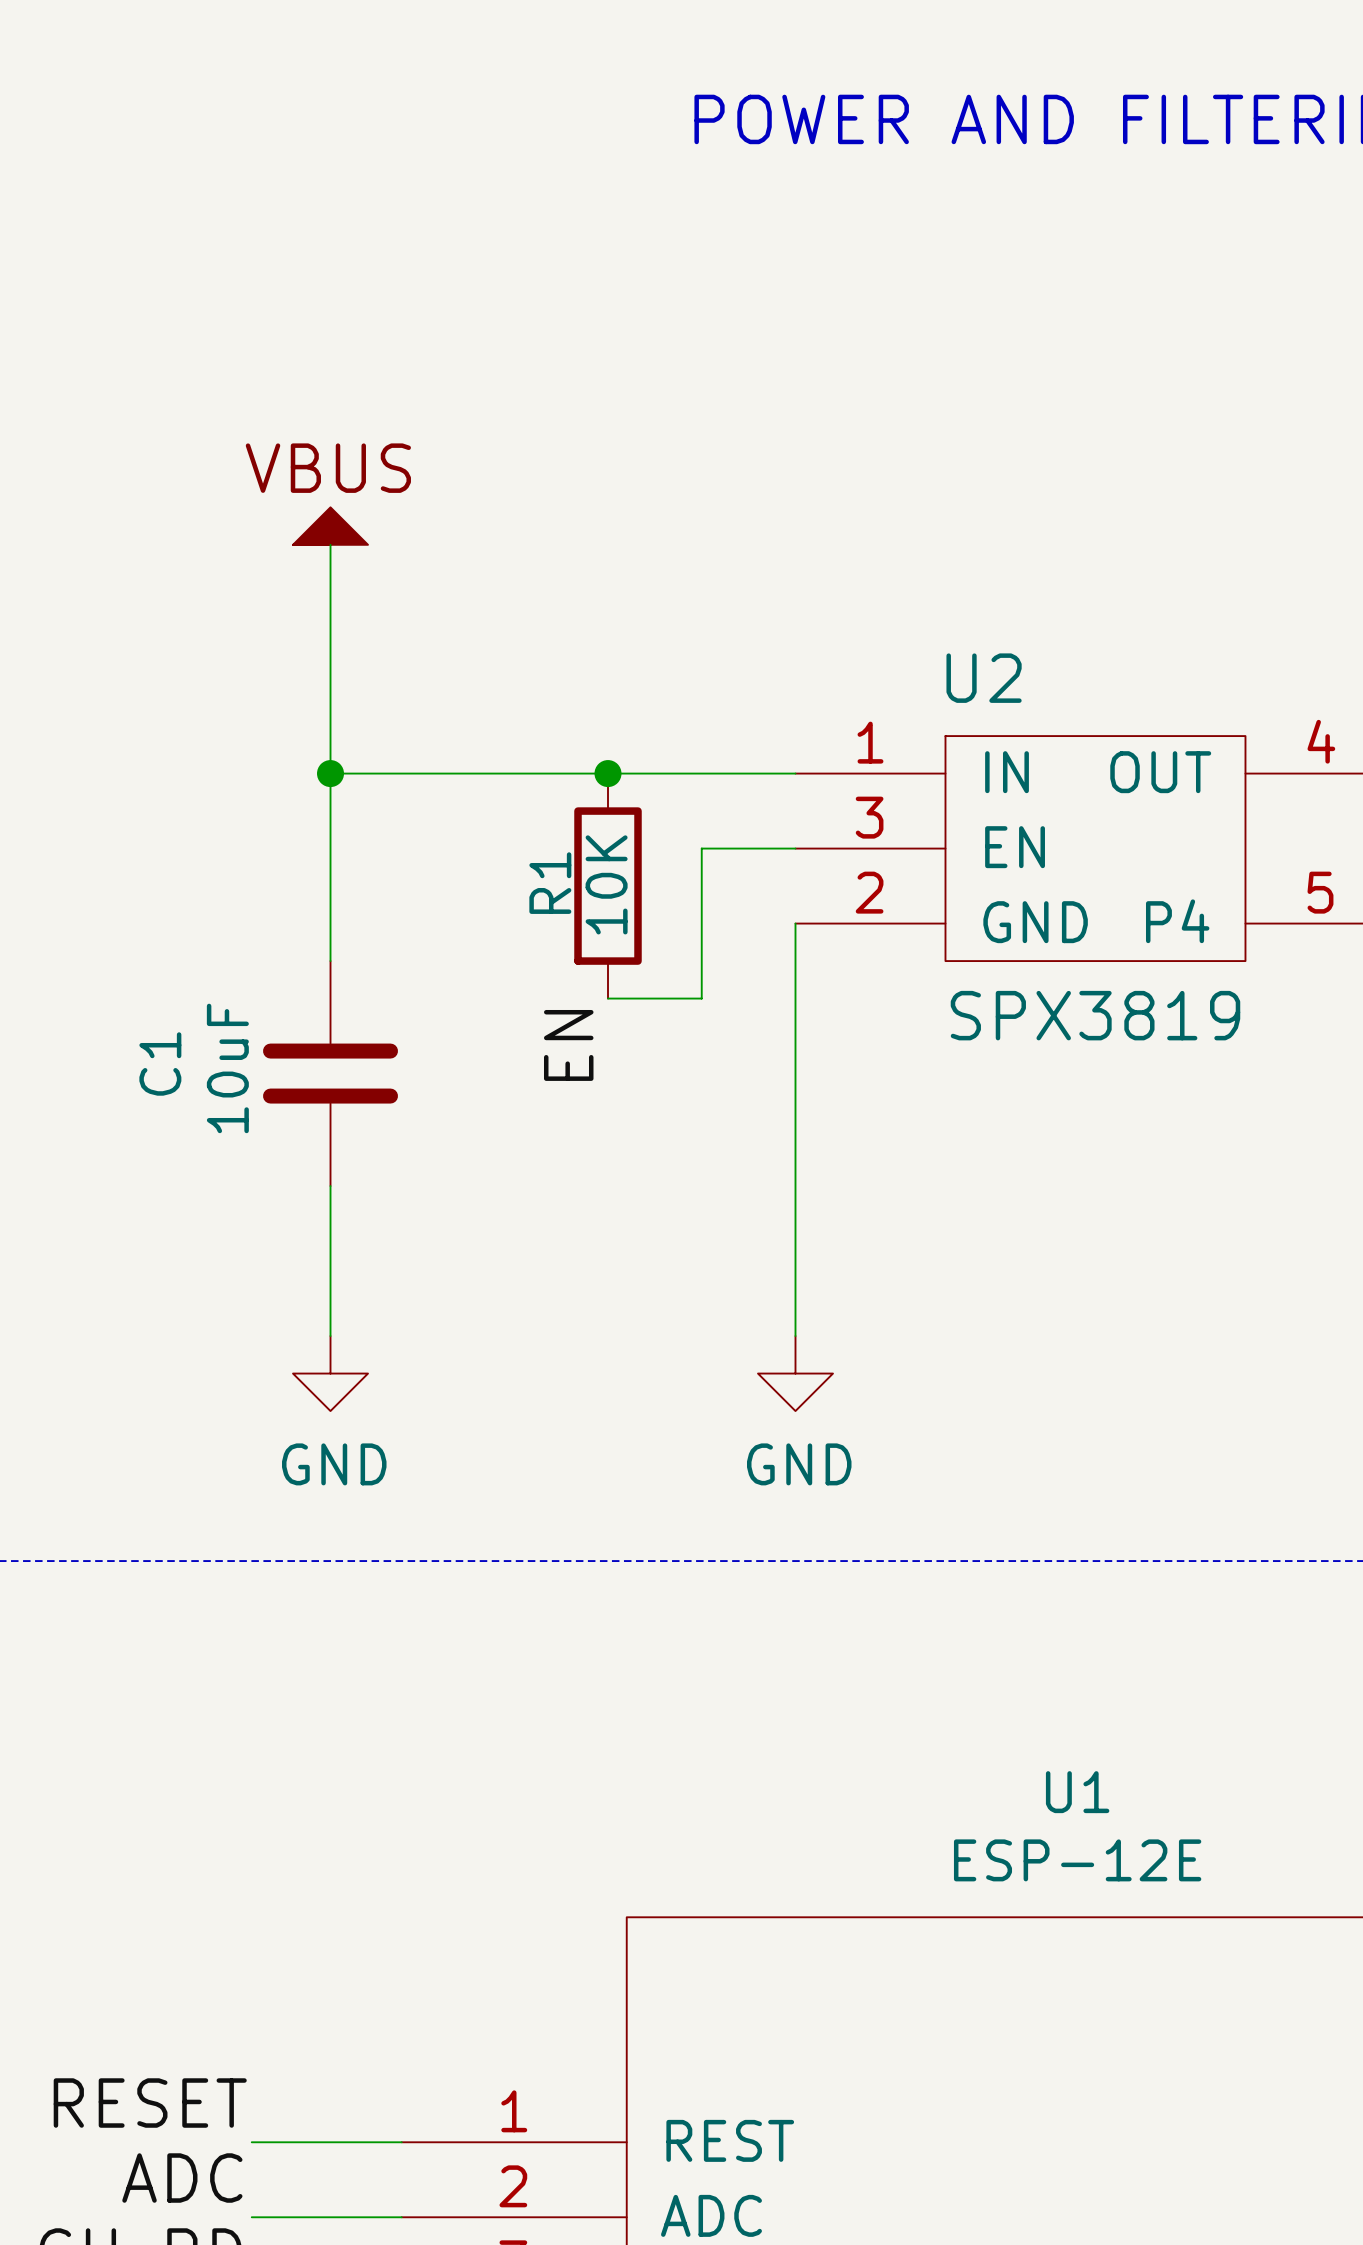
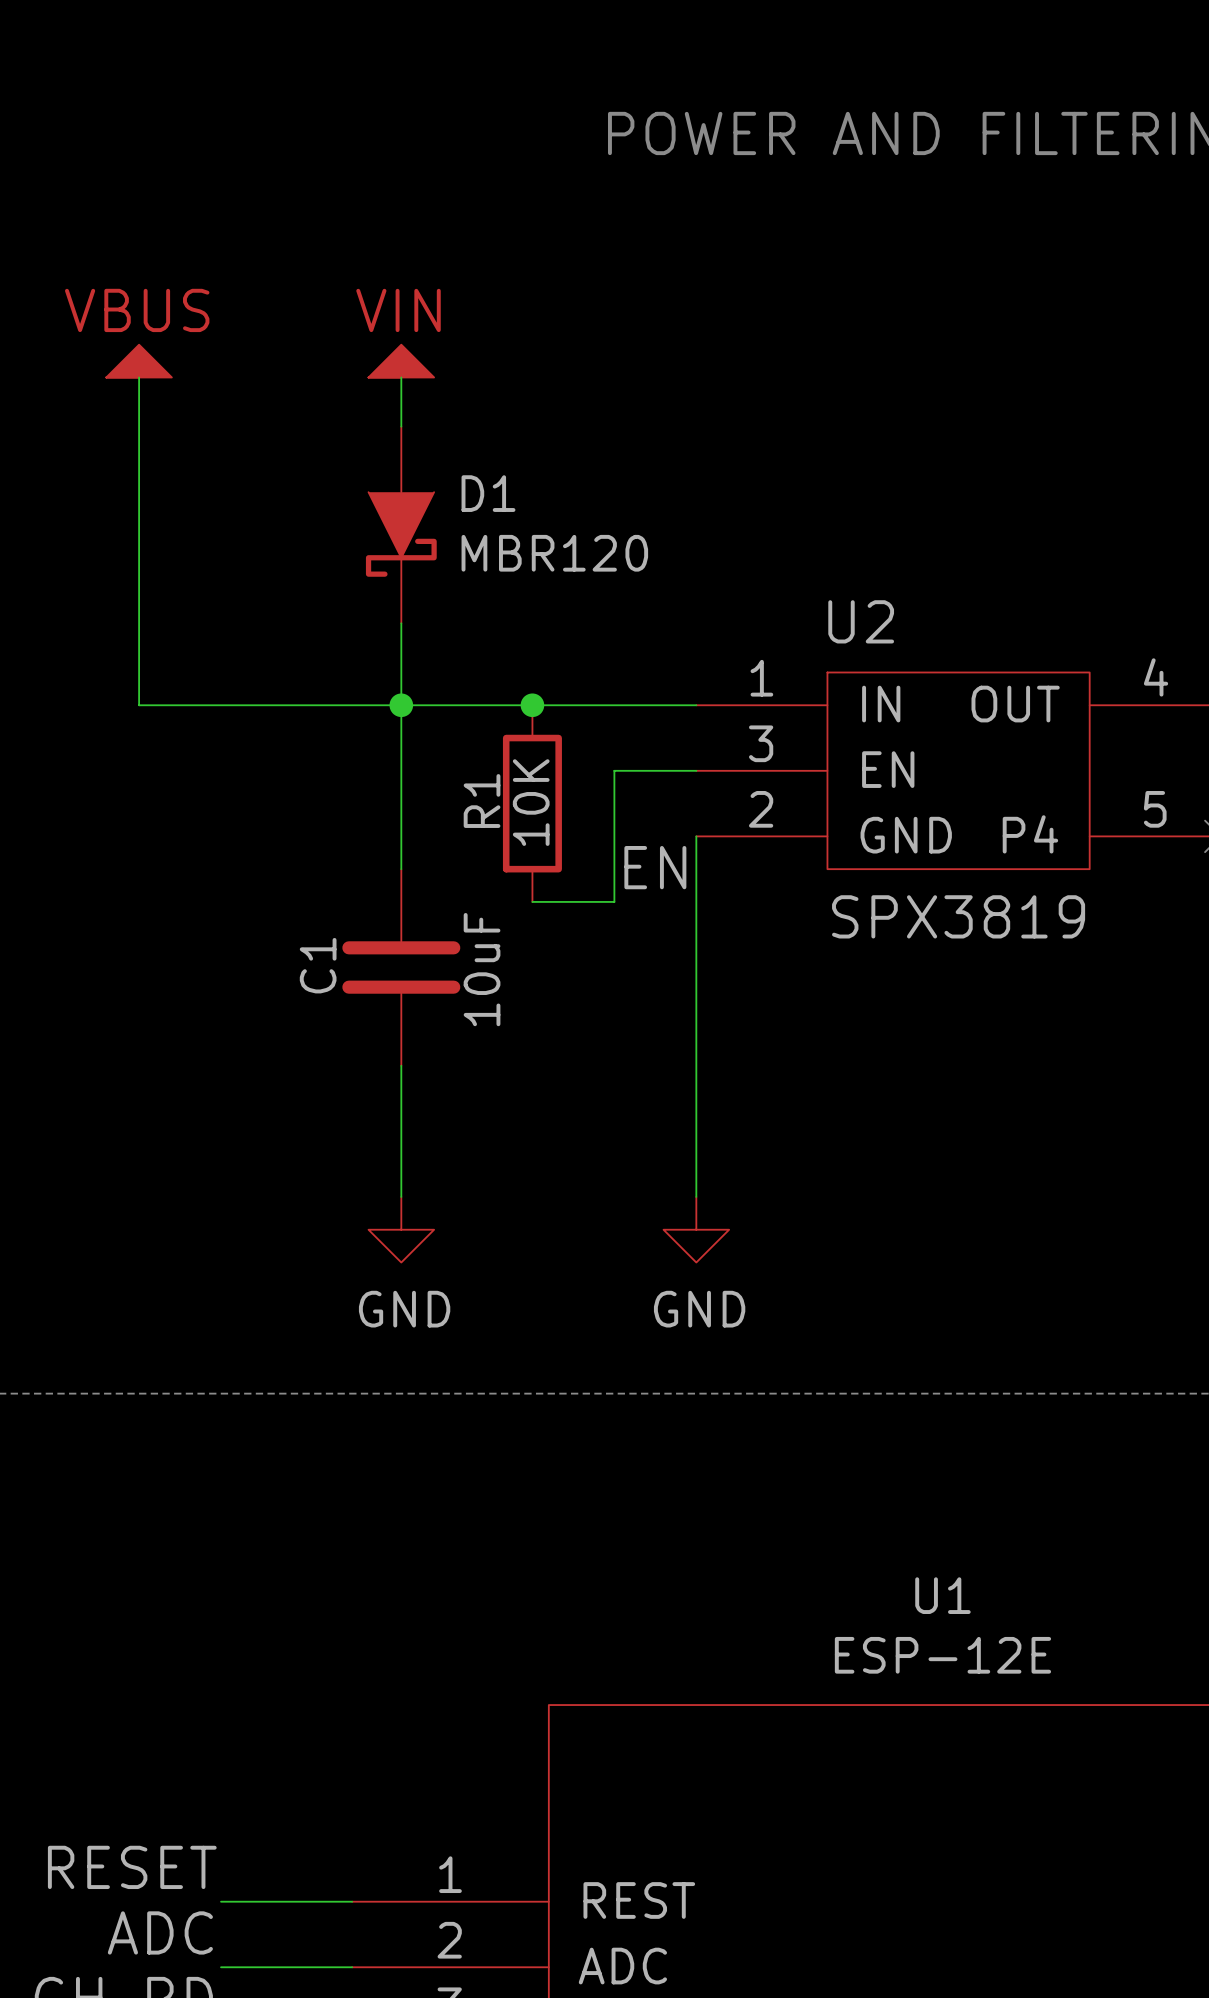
power symbol: none -> (401, 361)
wire: none -> (139, 377) (139, 705) (289, 705)
wire: none -> (401, 377) (401, 426)
power symbol position: (330, 526) -> (139, 361)
wire: (330, 544) (330, 961) -> none
D1: none -> MBR120 (401, 524)
wire: none -> (401, 623) (401, 869)
junction position: (330, 773) -> (401, 705)
label rotation: 0° (568, 1045) -> 90° clockwise (655, 867)
label position: EN (568, 1045) -> EN (655, 867)
C1 name position: C1 (160, 1063) -> C1 (318, 965)
C1 value position: 10uF (227, 1068) -> 10uF (482, 969)
C1 position: (330, 1073) -> (401, 967)
wire: (330, 1186) (330, 1336) -> (401, 1065) (401, 1196)
power symbol position: GND (330, 1373) -> GND (401, 1229)

